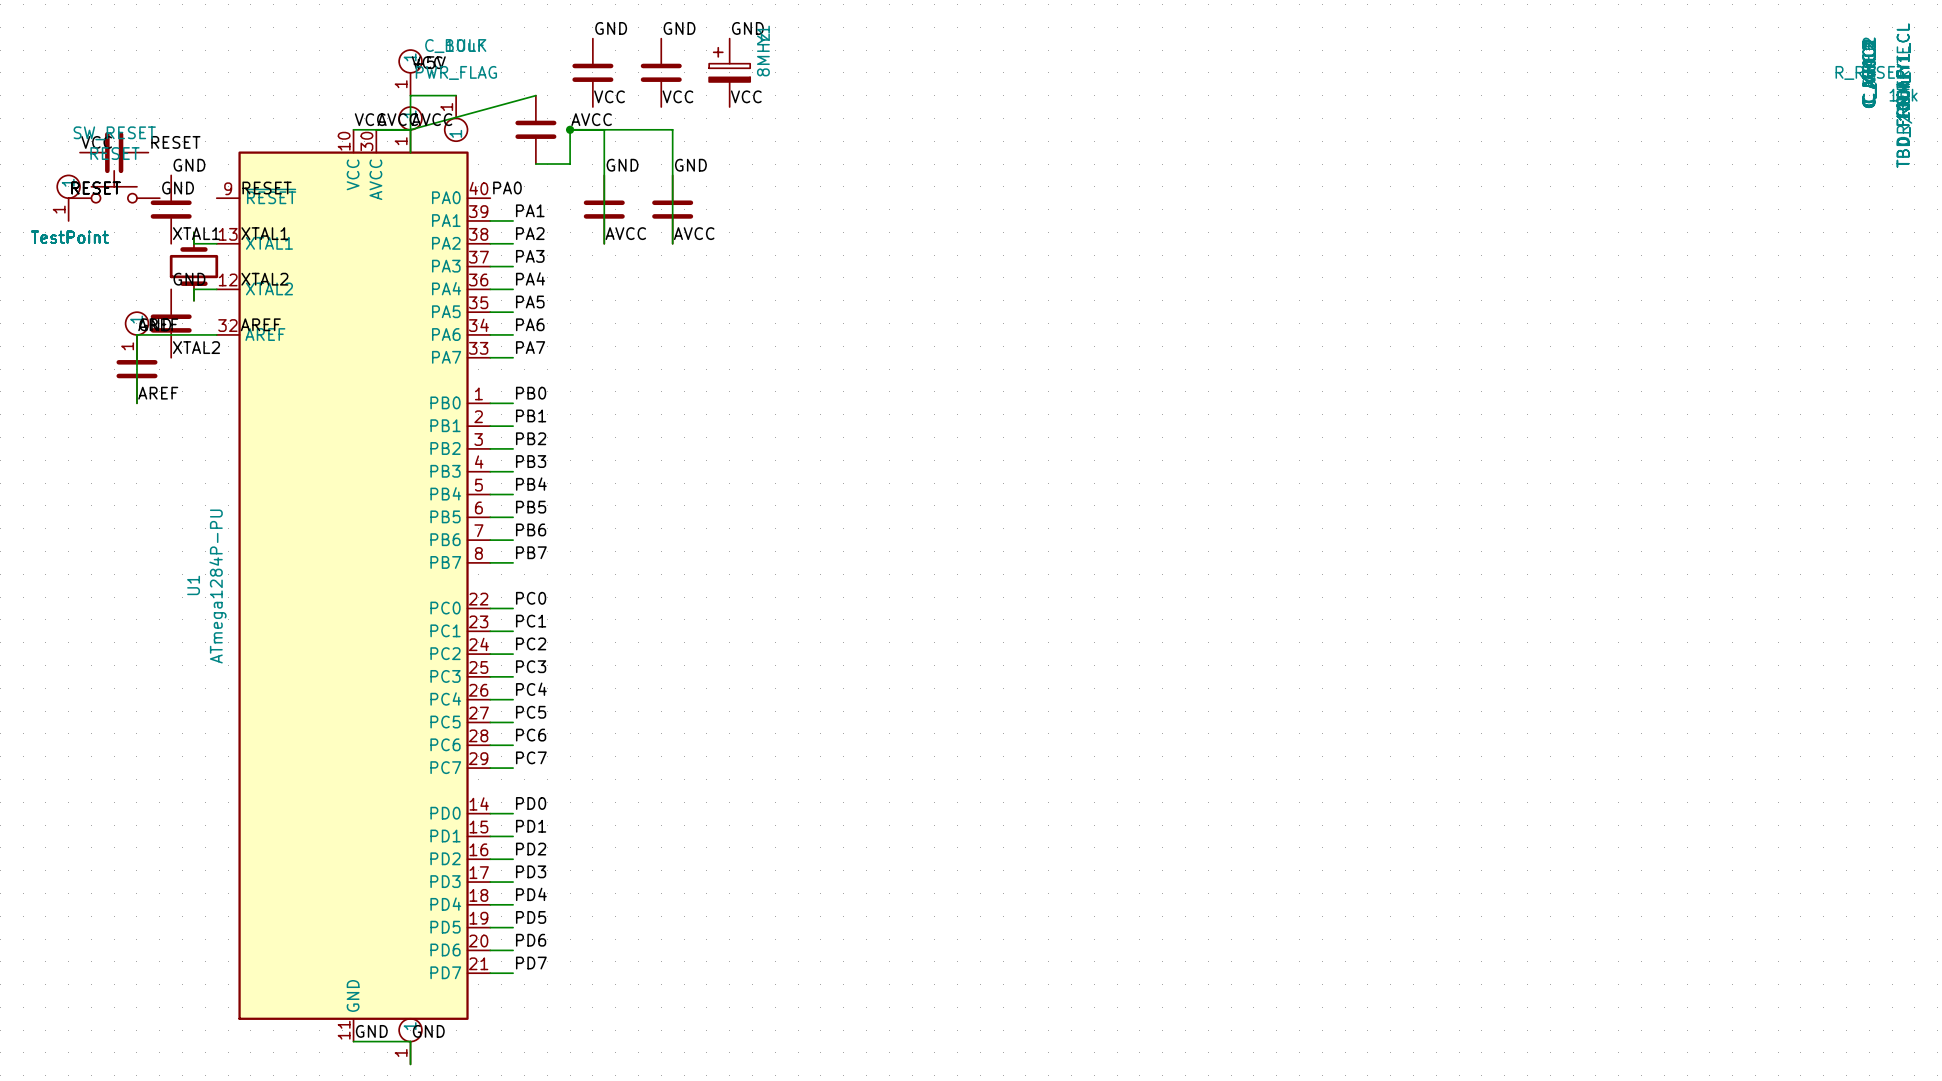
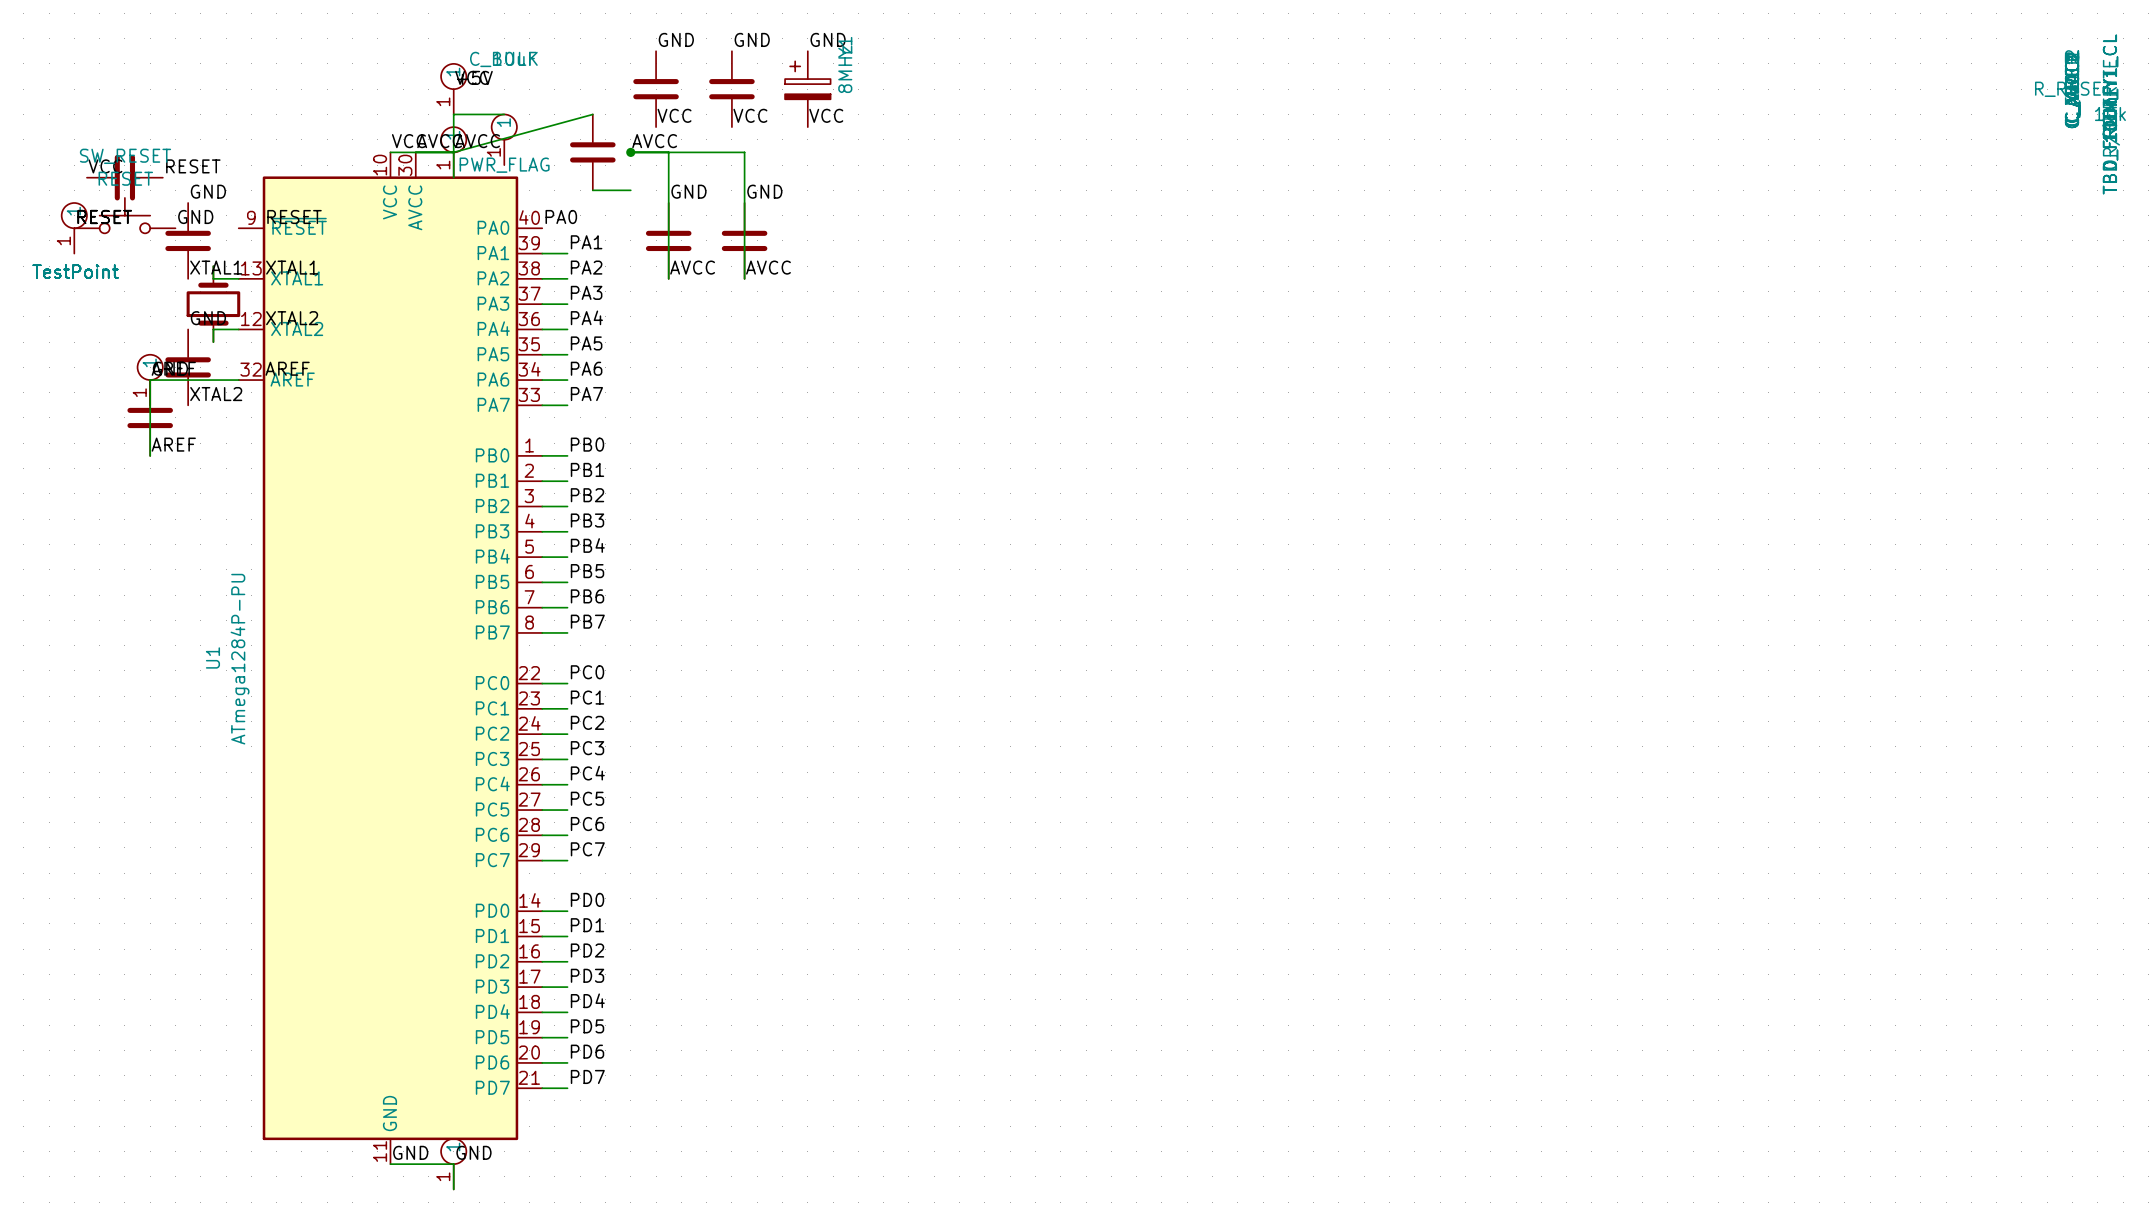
power symbol text position: PWR_FLAG (456, 72) -> PWR_FLAG (504, 165)
power symbol rotation: 0° (456, 129) -> 180° (504, 127)
wire: (570, 129) (570, 164) -> none

